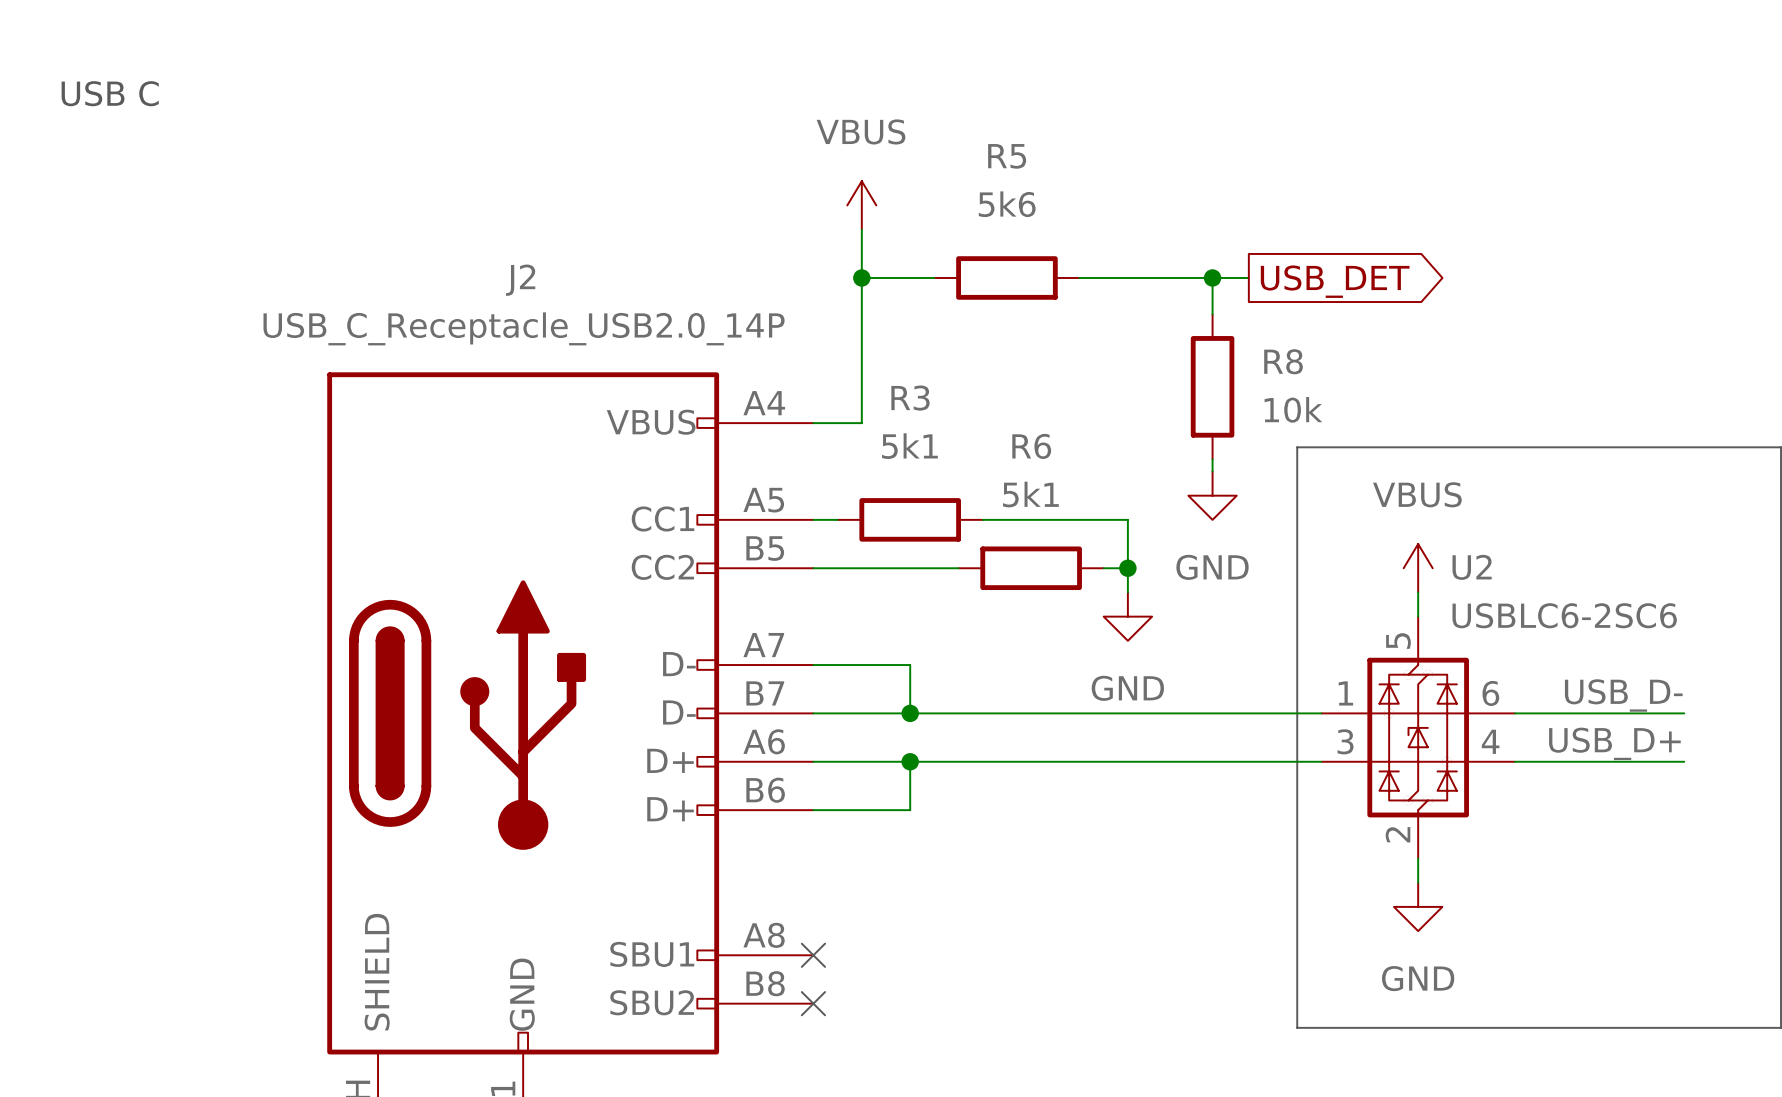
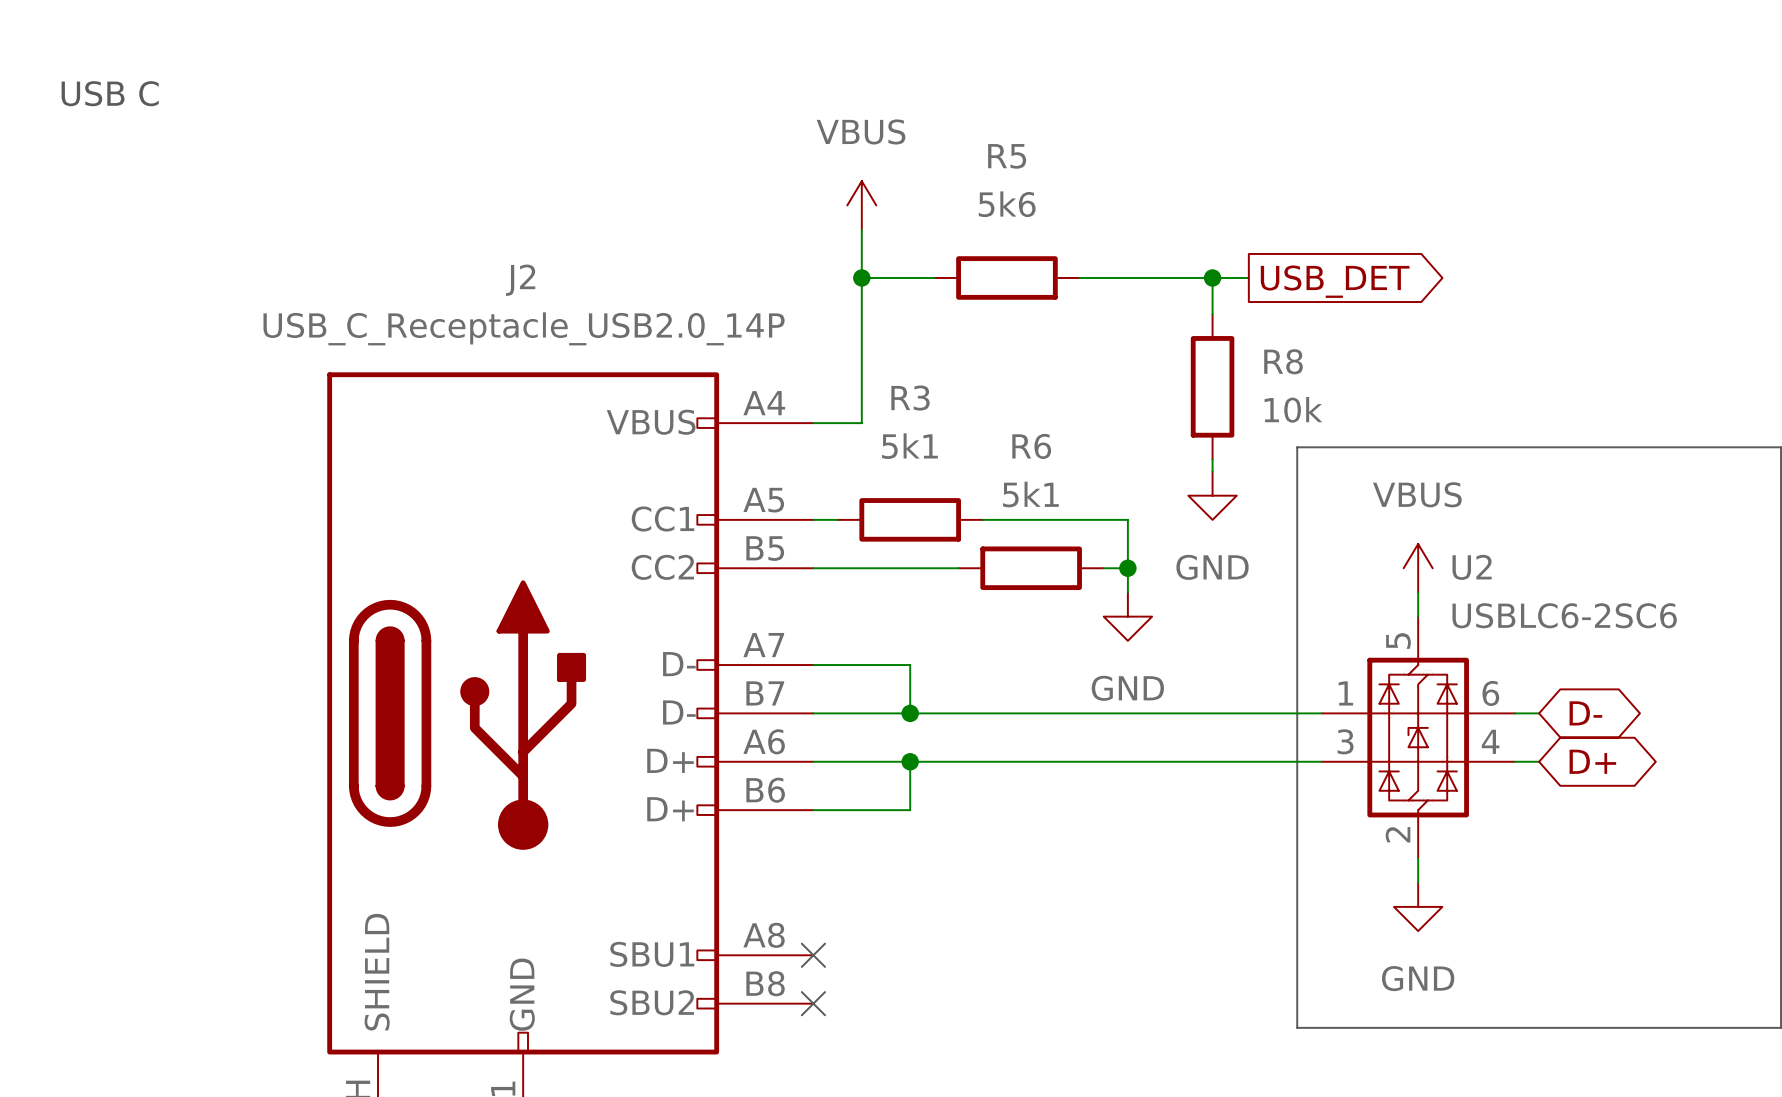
label: USB_D- (1623, 695) -> none
wire: (1539, 713) (1684, 713) -> none
global label: none -> D- (1585, 713)
label: USB_D+ (1614, 743) -> none
wire: (1539, 761) (1684, 761) -> none
global label: none -> D+ (1592, 761)

